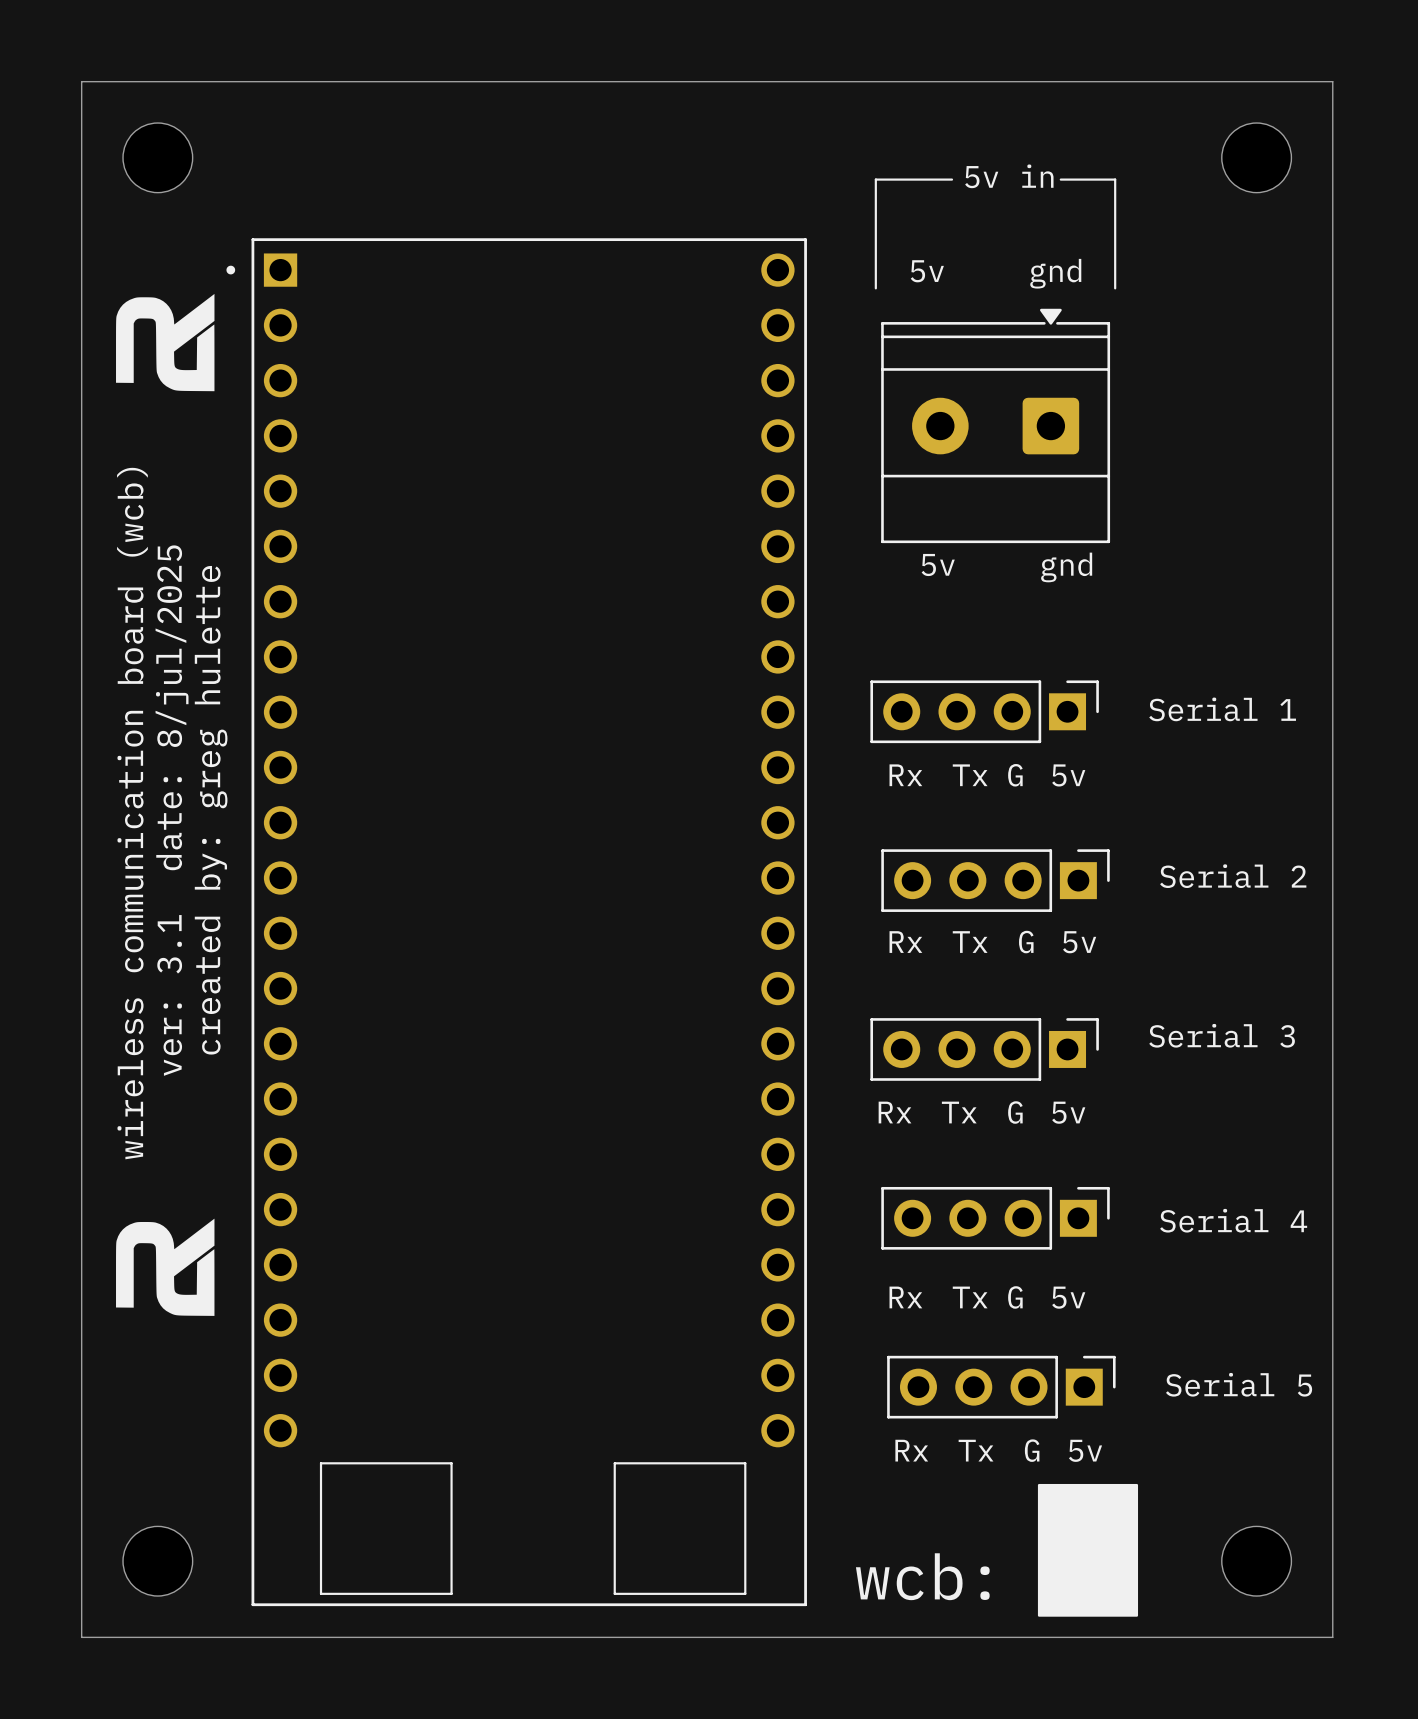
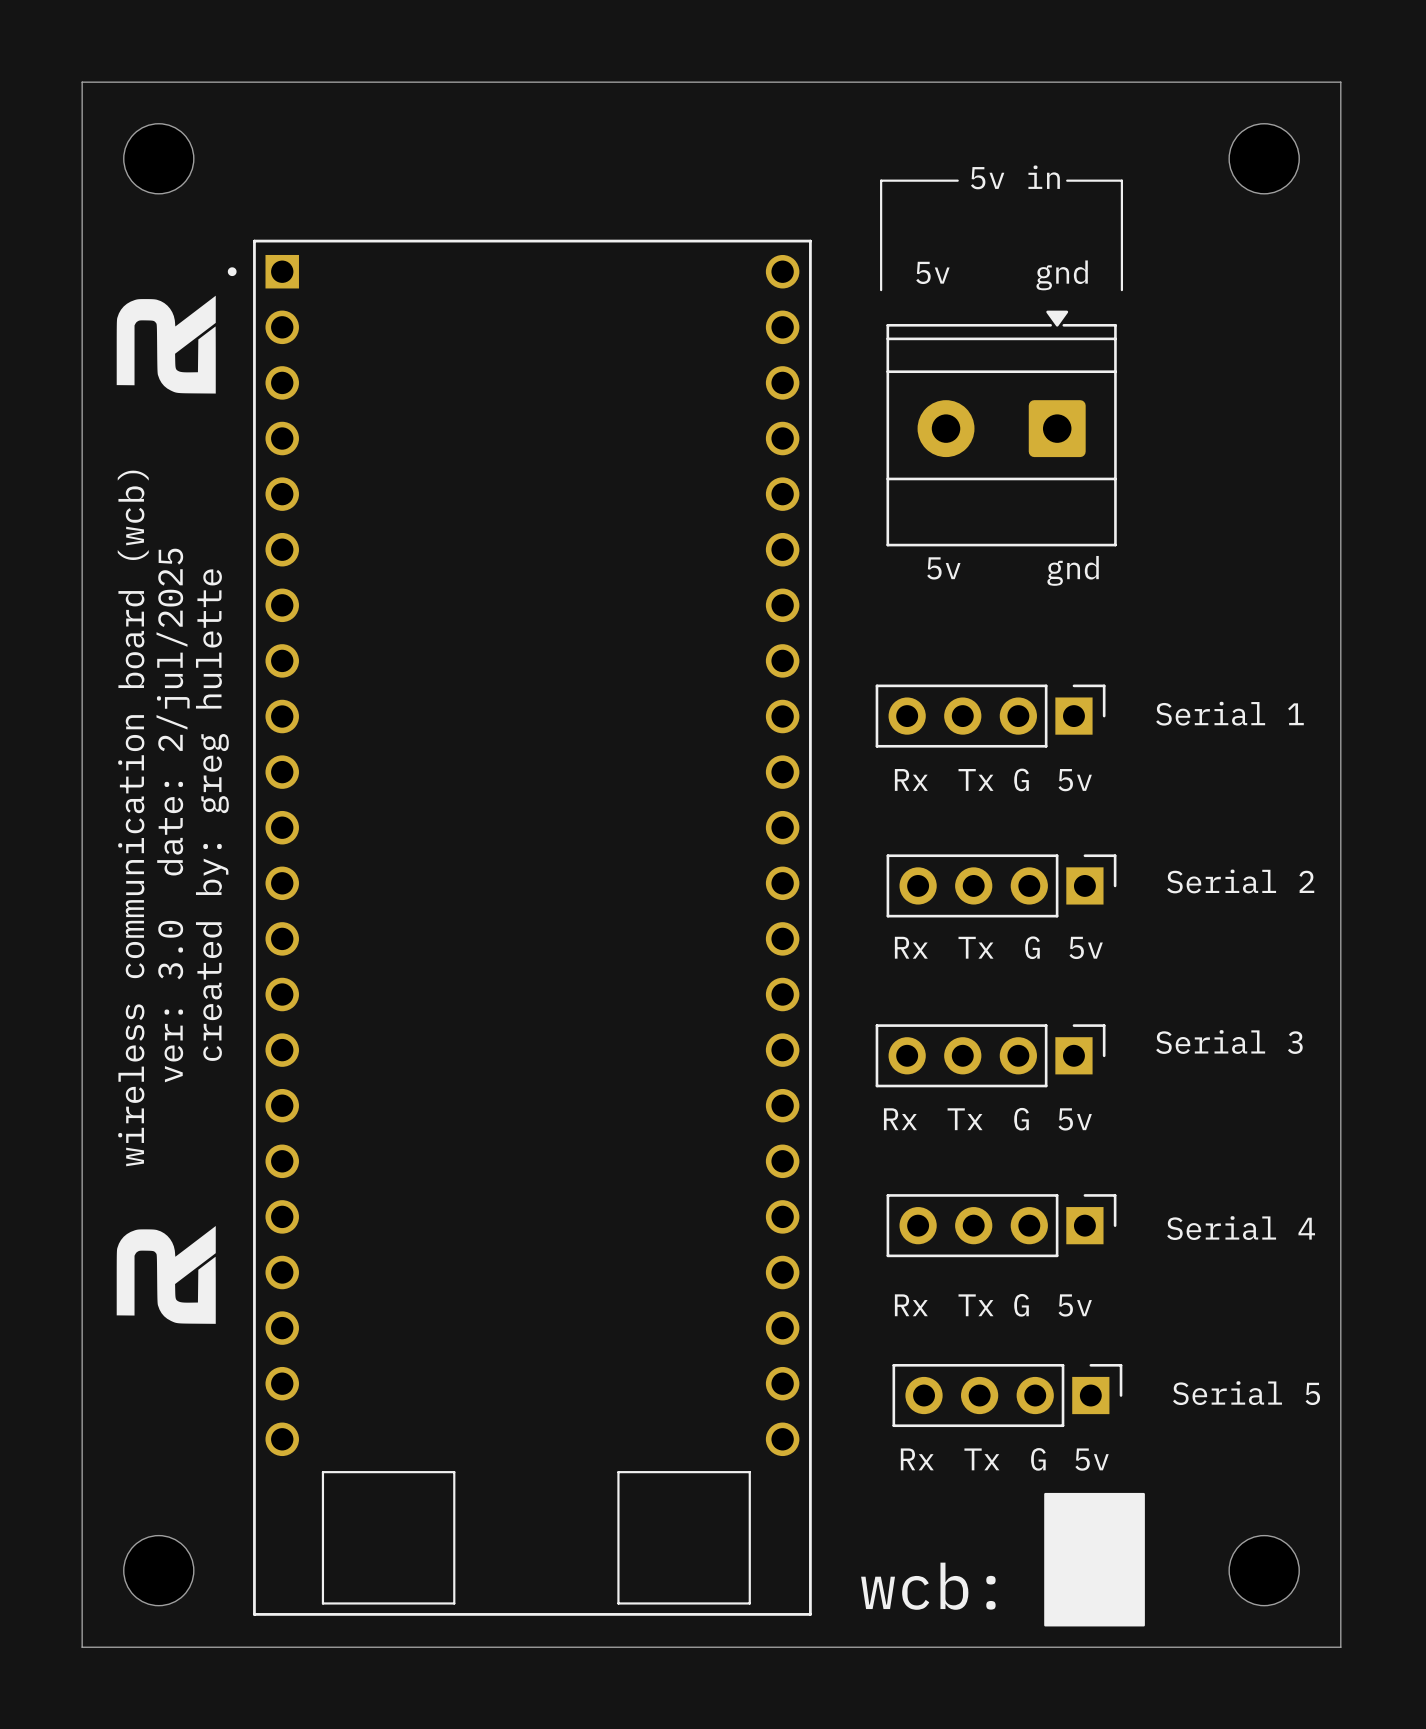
text: ver: 3.1 date: 8/jul/2025 (172, 810) -> ver: 3.0 date: 2/jul/2025 (173, 815)

